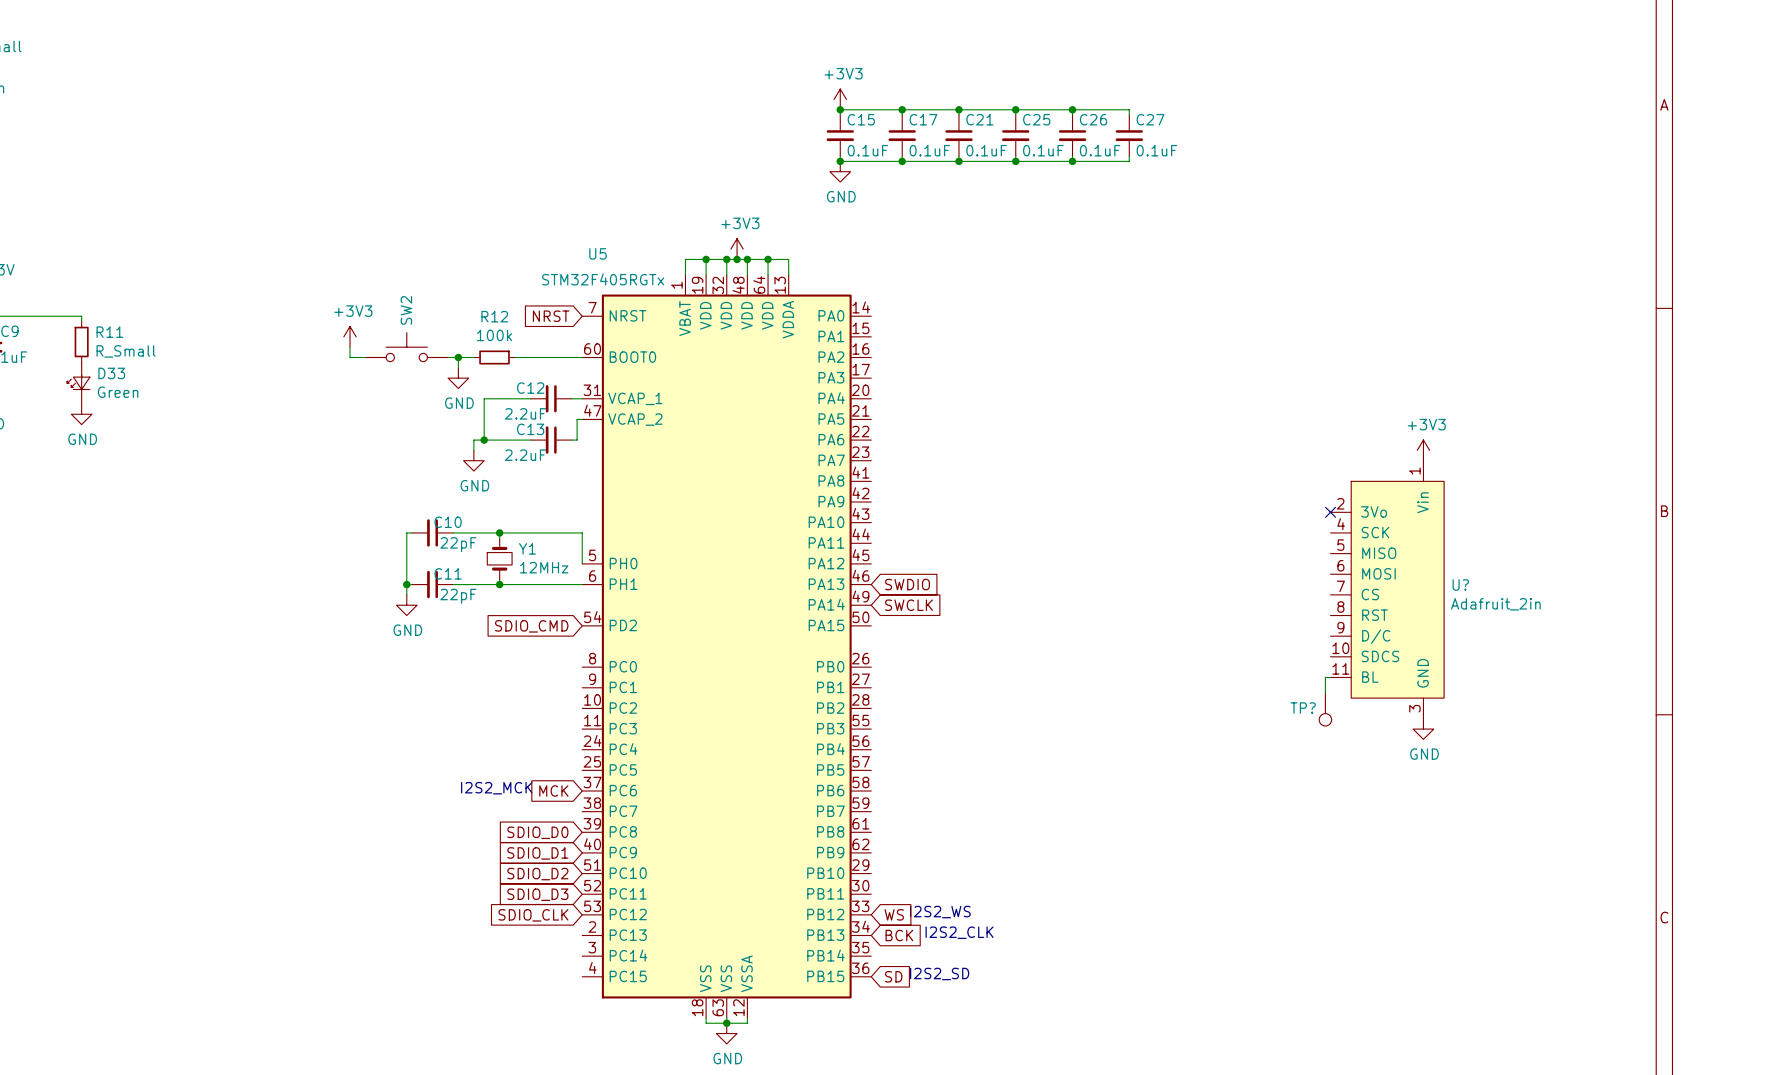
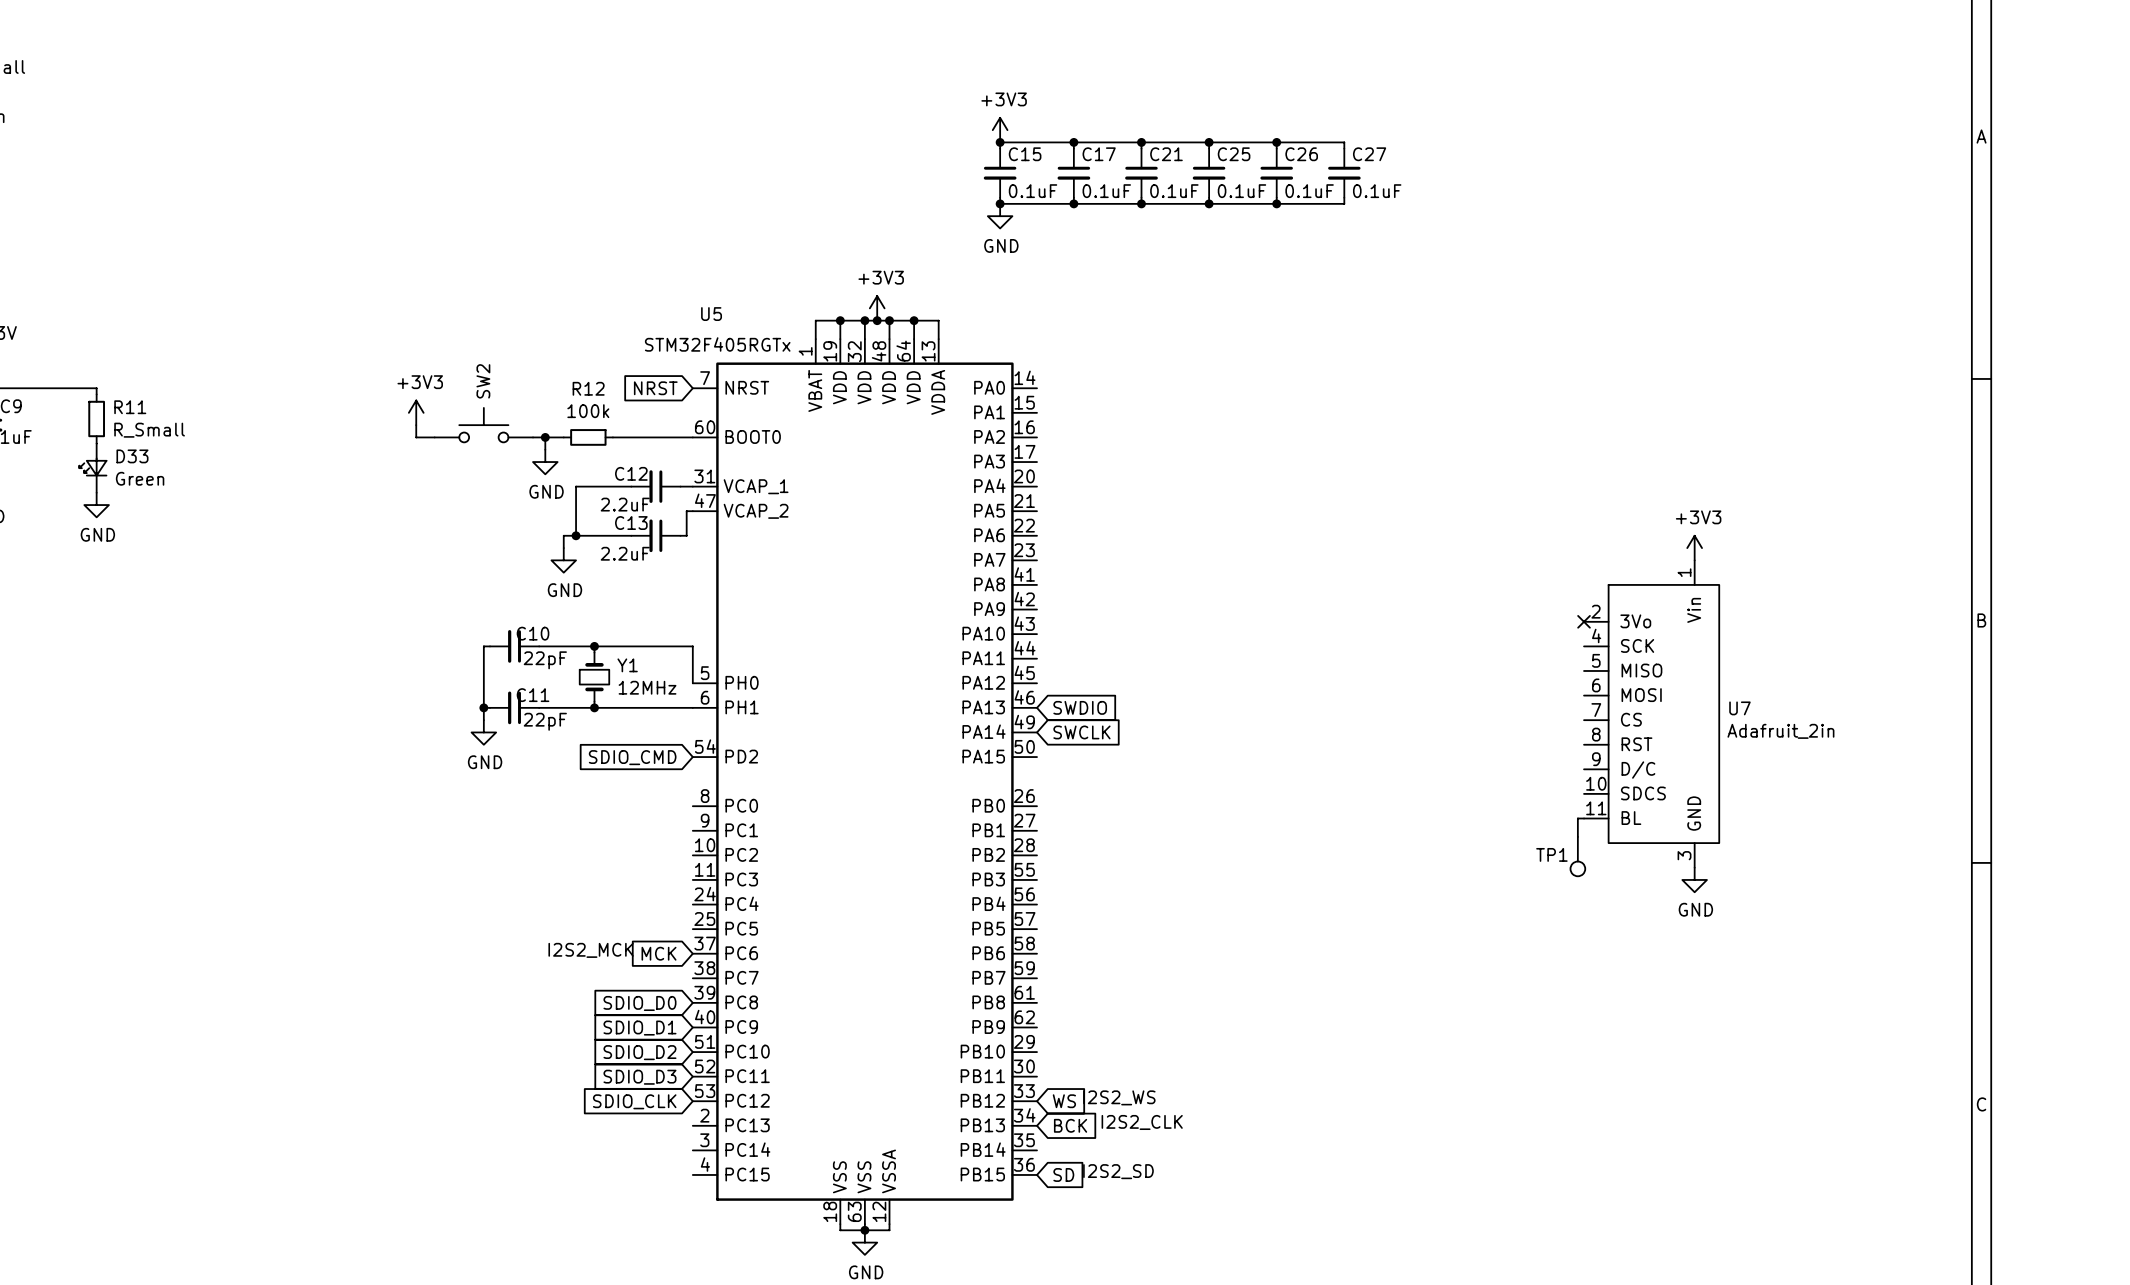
U? name: U? (1460, 585) -> U7 (1739, 708)
TP? name: TP? (1303, 708) -> TP1 (1551, 854)

